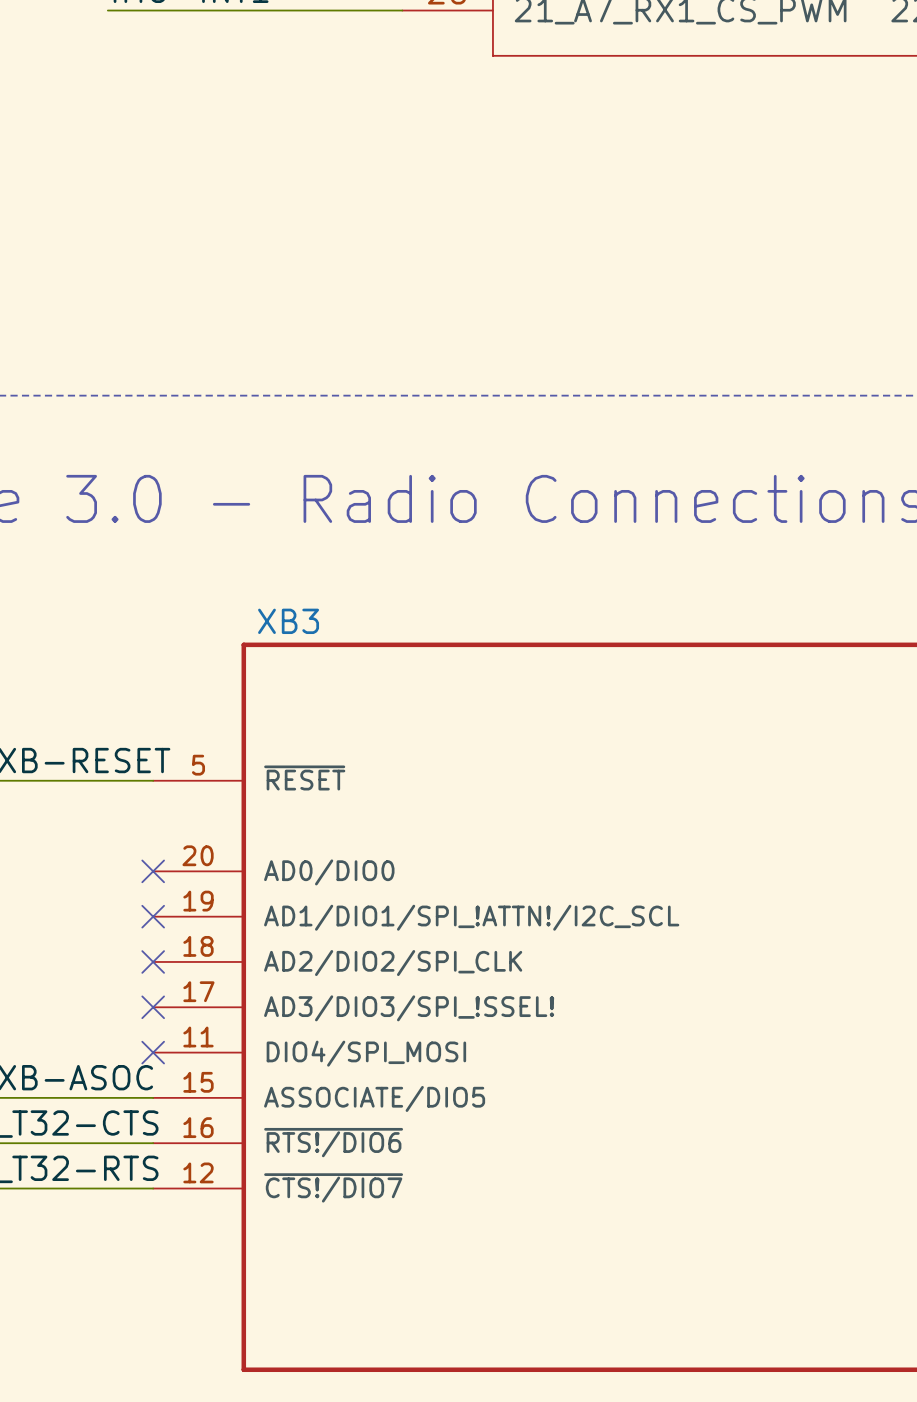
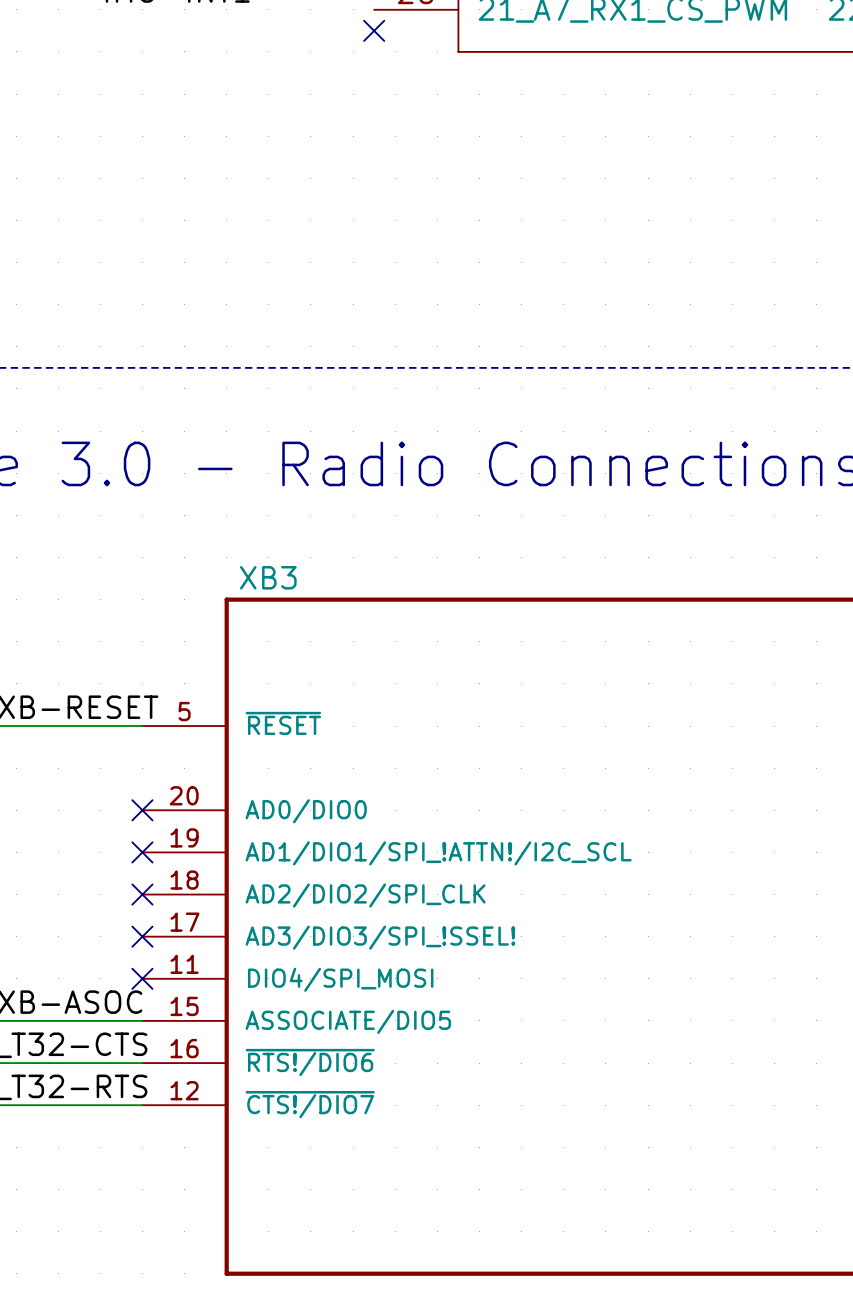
wire: (107, 10) (402, 10) -> none
no-connect mark: none -> (374, 30)

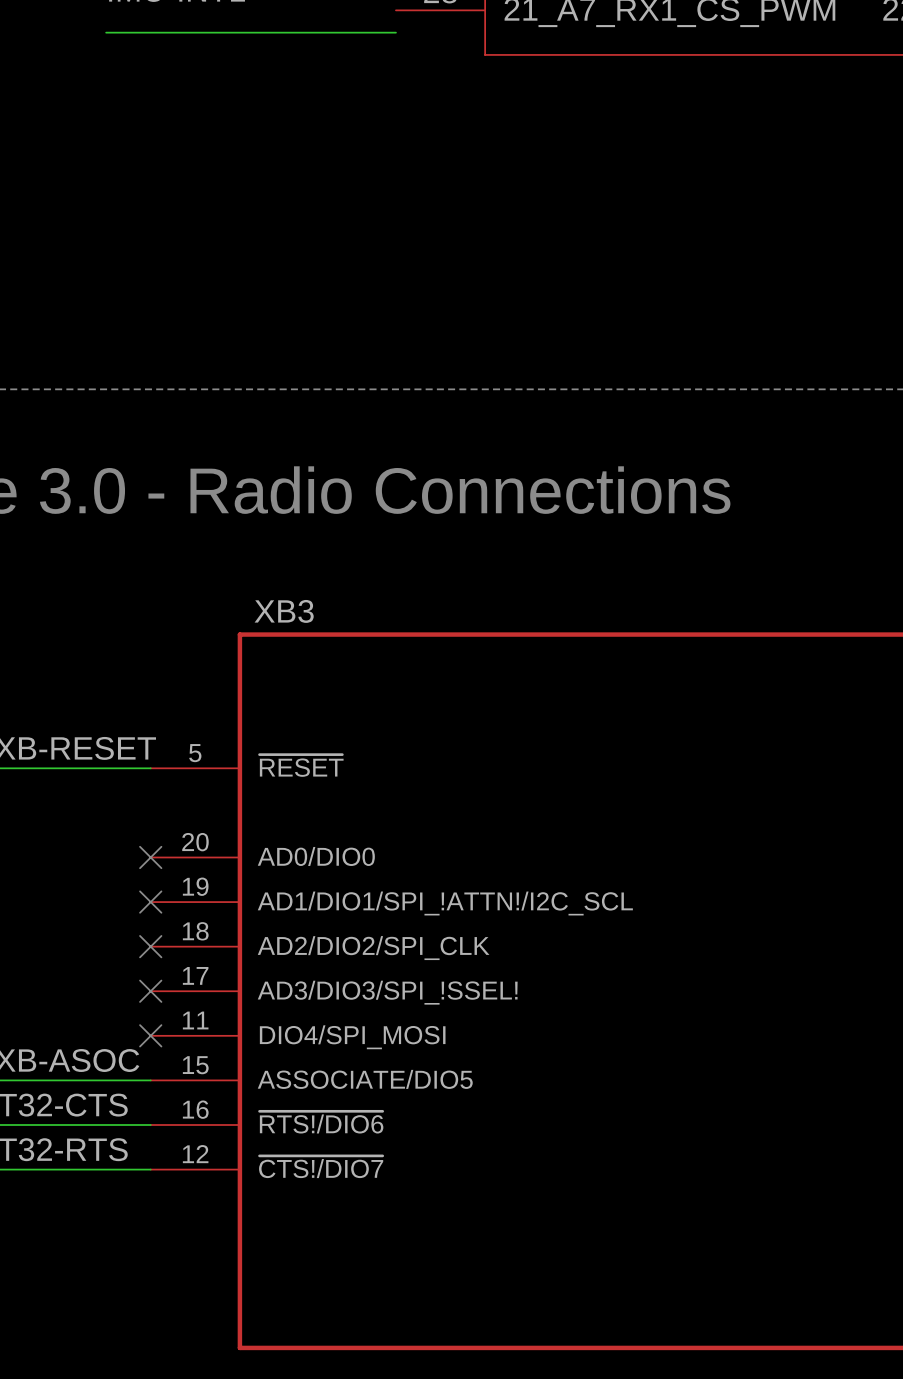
wire: none -> (106, 32) (395, 32)
no-connect mark: (374, 30) -> none

